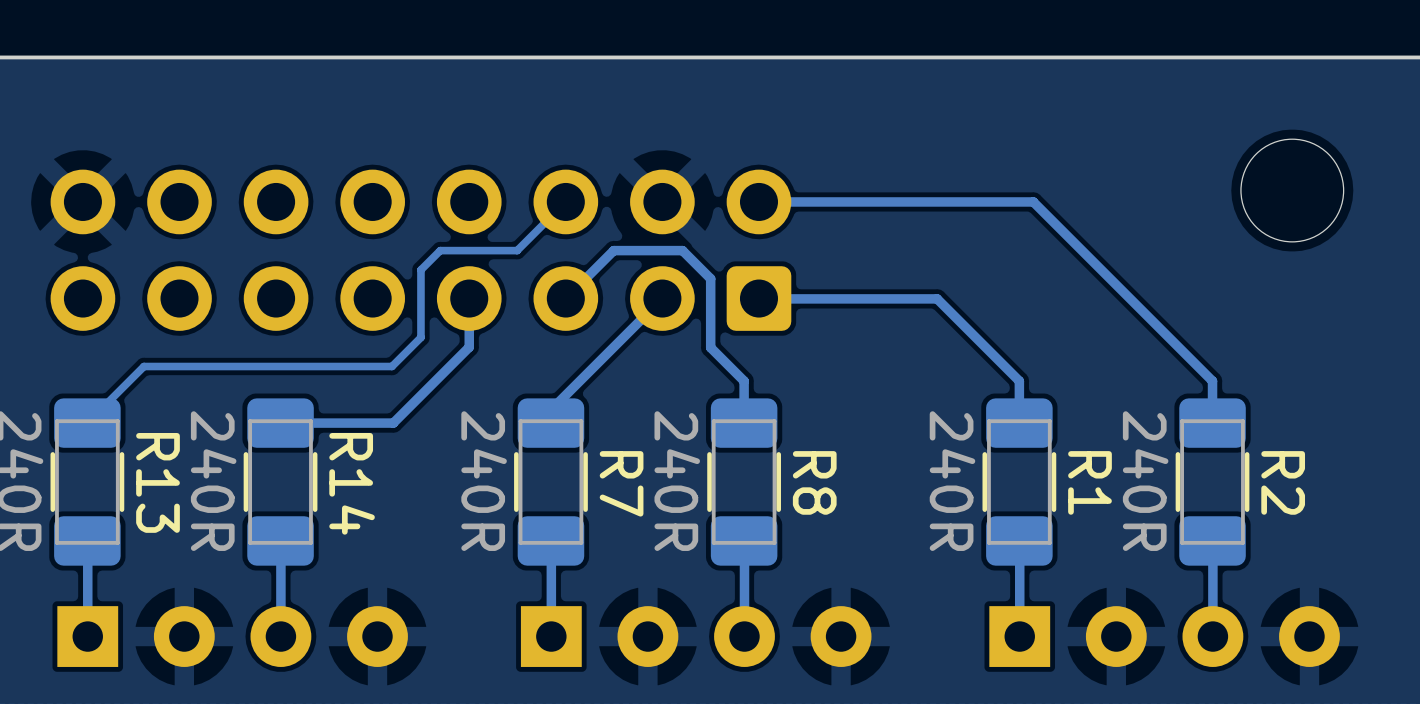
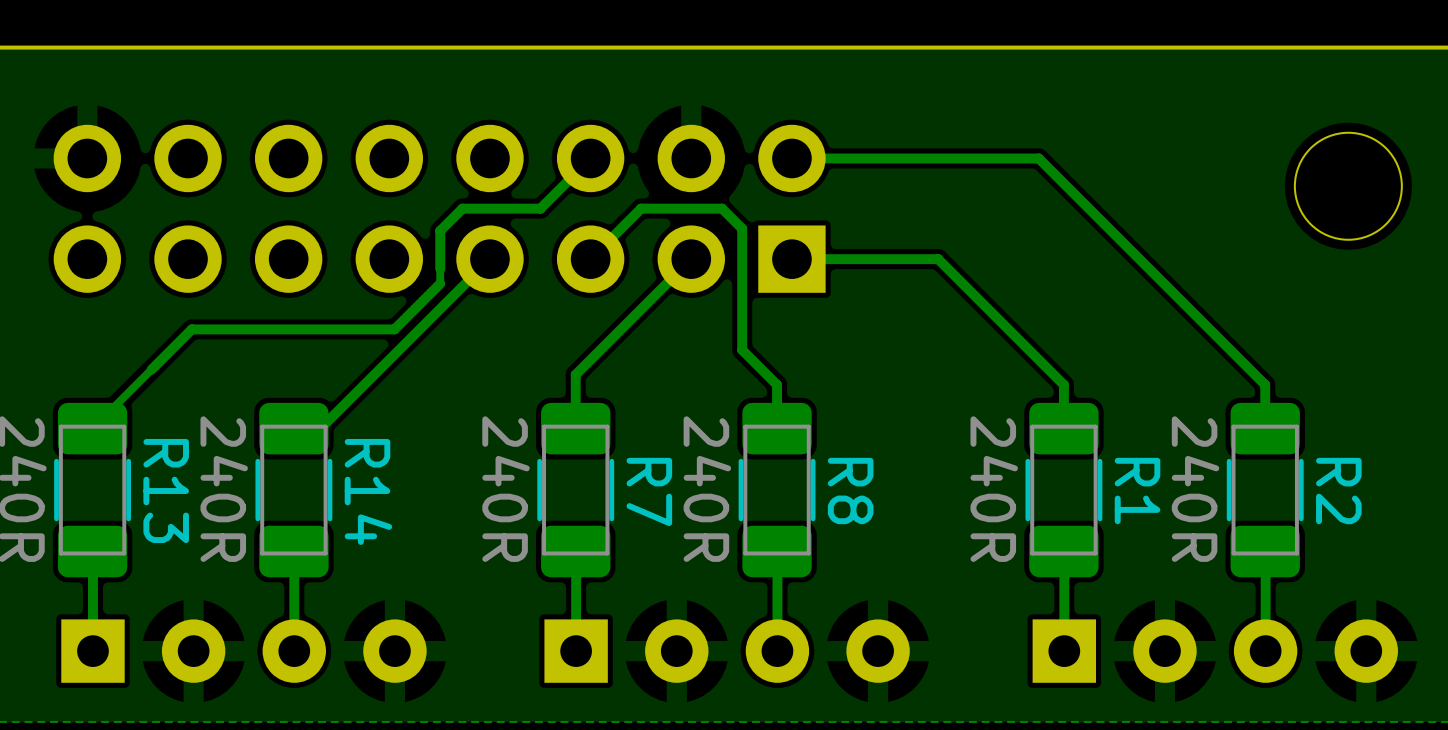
track: (565, 201) (517, 250) (440, 250) (420, 269) -> (590, 158) (540, 208) (462, 208) (440, 230) (440, 269)
track: (1033, 201) (758, 201) -> (1078, 198) (1038, 158) (791, 158)
part: none -> (439, 208)
part: (420, 250) -> none
track: (710, 278) (682, 250) (613, 250) (565, 298) -> (742, 278) (742, 228) (722, 208) (641, 208) (590, 259)
track: (420, 284) (420, 337) (391, 366) (143, 366) -> (440, 283) (394, 329) (191, 329) (151, 369)
track: (469, 298) (469, 347) (393, 423) (306, 423) -> (489, 259) (320, 428)
track: (937, 298) (759, 298) -> (978, 299) (938, 259) (791, 259)
track: (661, 299) (550, 409) -> (691, 259) (575, 374) (575, 414)

